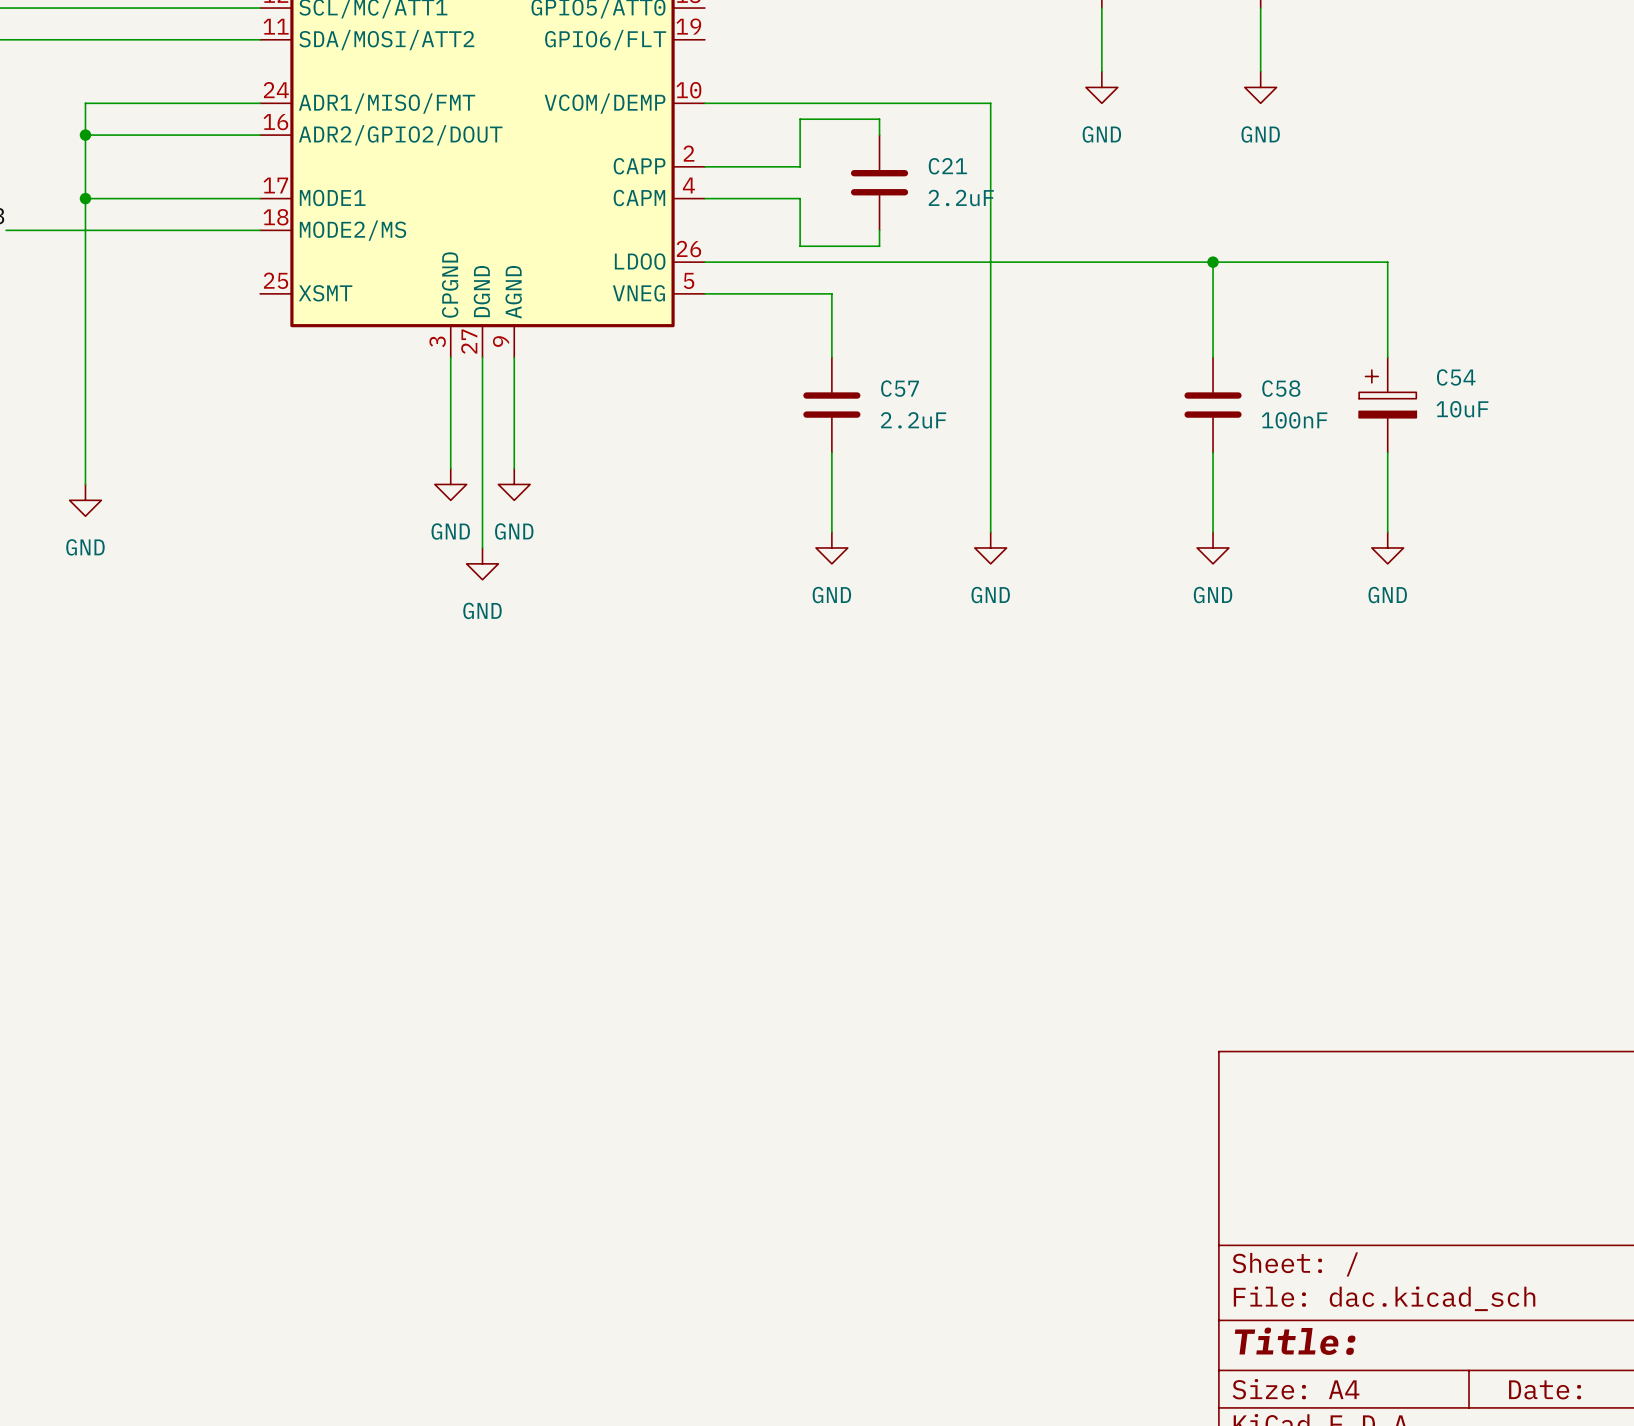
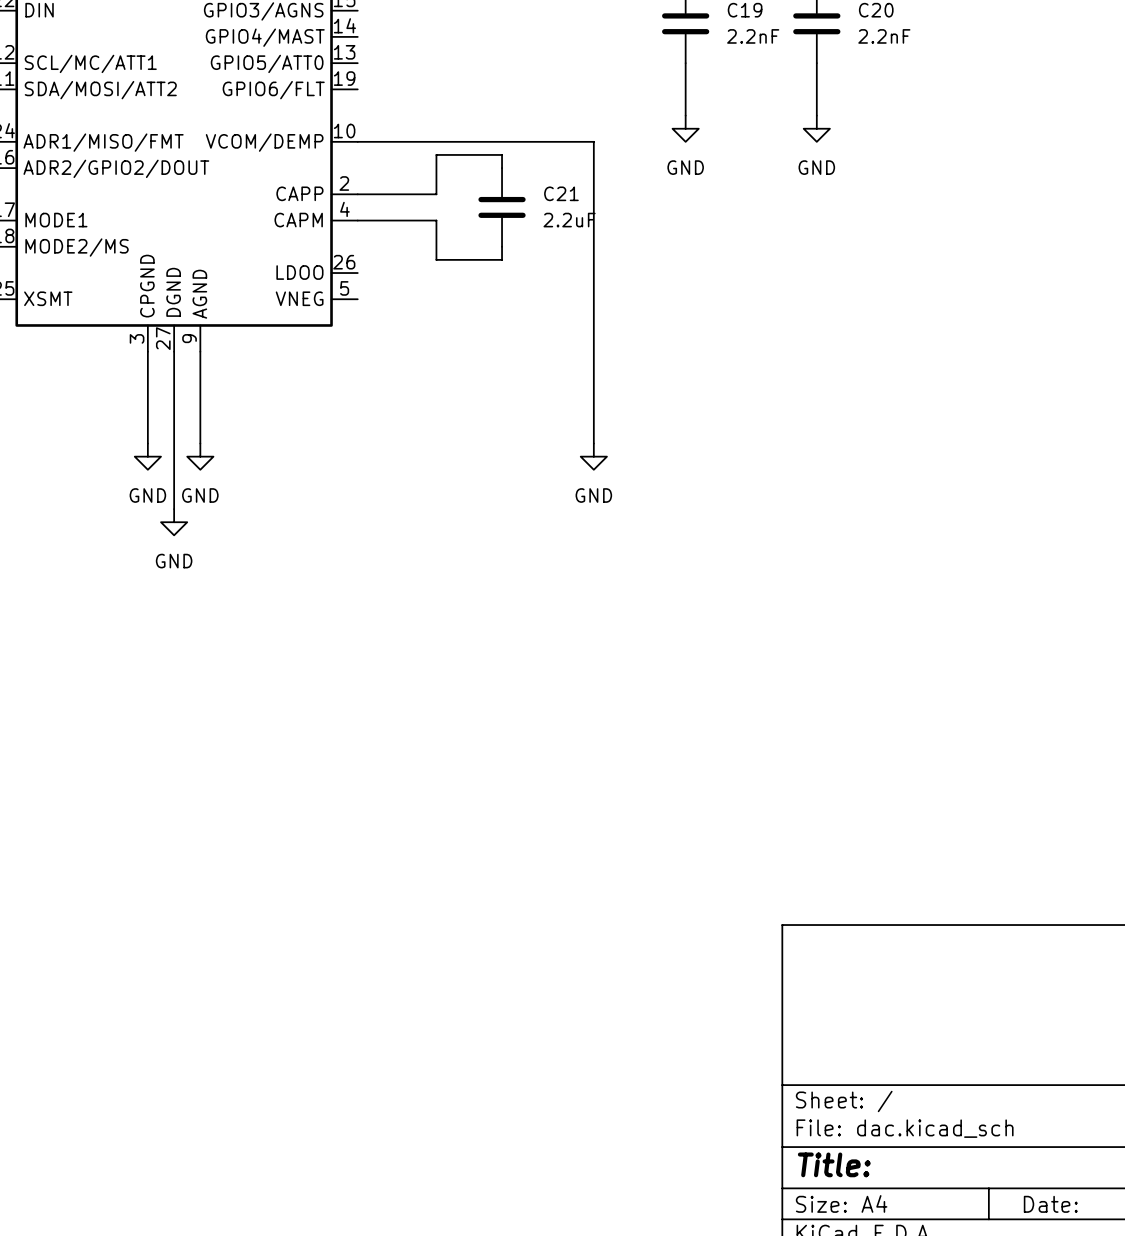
wire: (704, 262) (1387, 262) (1387, 357) -> none
wire: (1213, 262) (1213, 357) -> none
junction: (1213, 262) -> none
wire: (704, 293) (831, 293) (831, 357) -> none
C57: 2.2uF (831, 405) -> none
C58: 100nF (1213, 405) -> none
C54: 10uF (1387, 405) -> none
wire: (831, 452) (831, 532) -> none
wire: (1213, 452) (1213, 532) -> none
wire: (1387, 452) (1387, 532) -> none
wire: (990, 468) (990, 532) -> none
power symbol: GND (831, 547) -> none
power symbol position: GND (990, 547) -> GND (593, 456)
power symbol: GND (1213, 547) -> none
power symbol: GND (1387, 547) -> none

